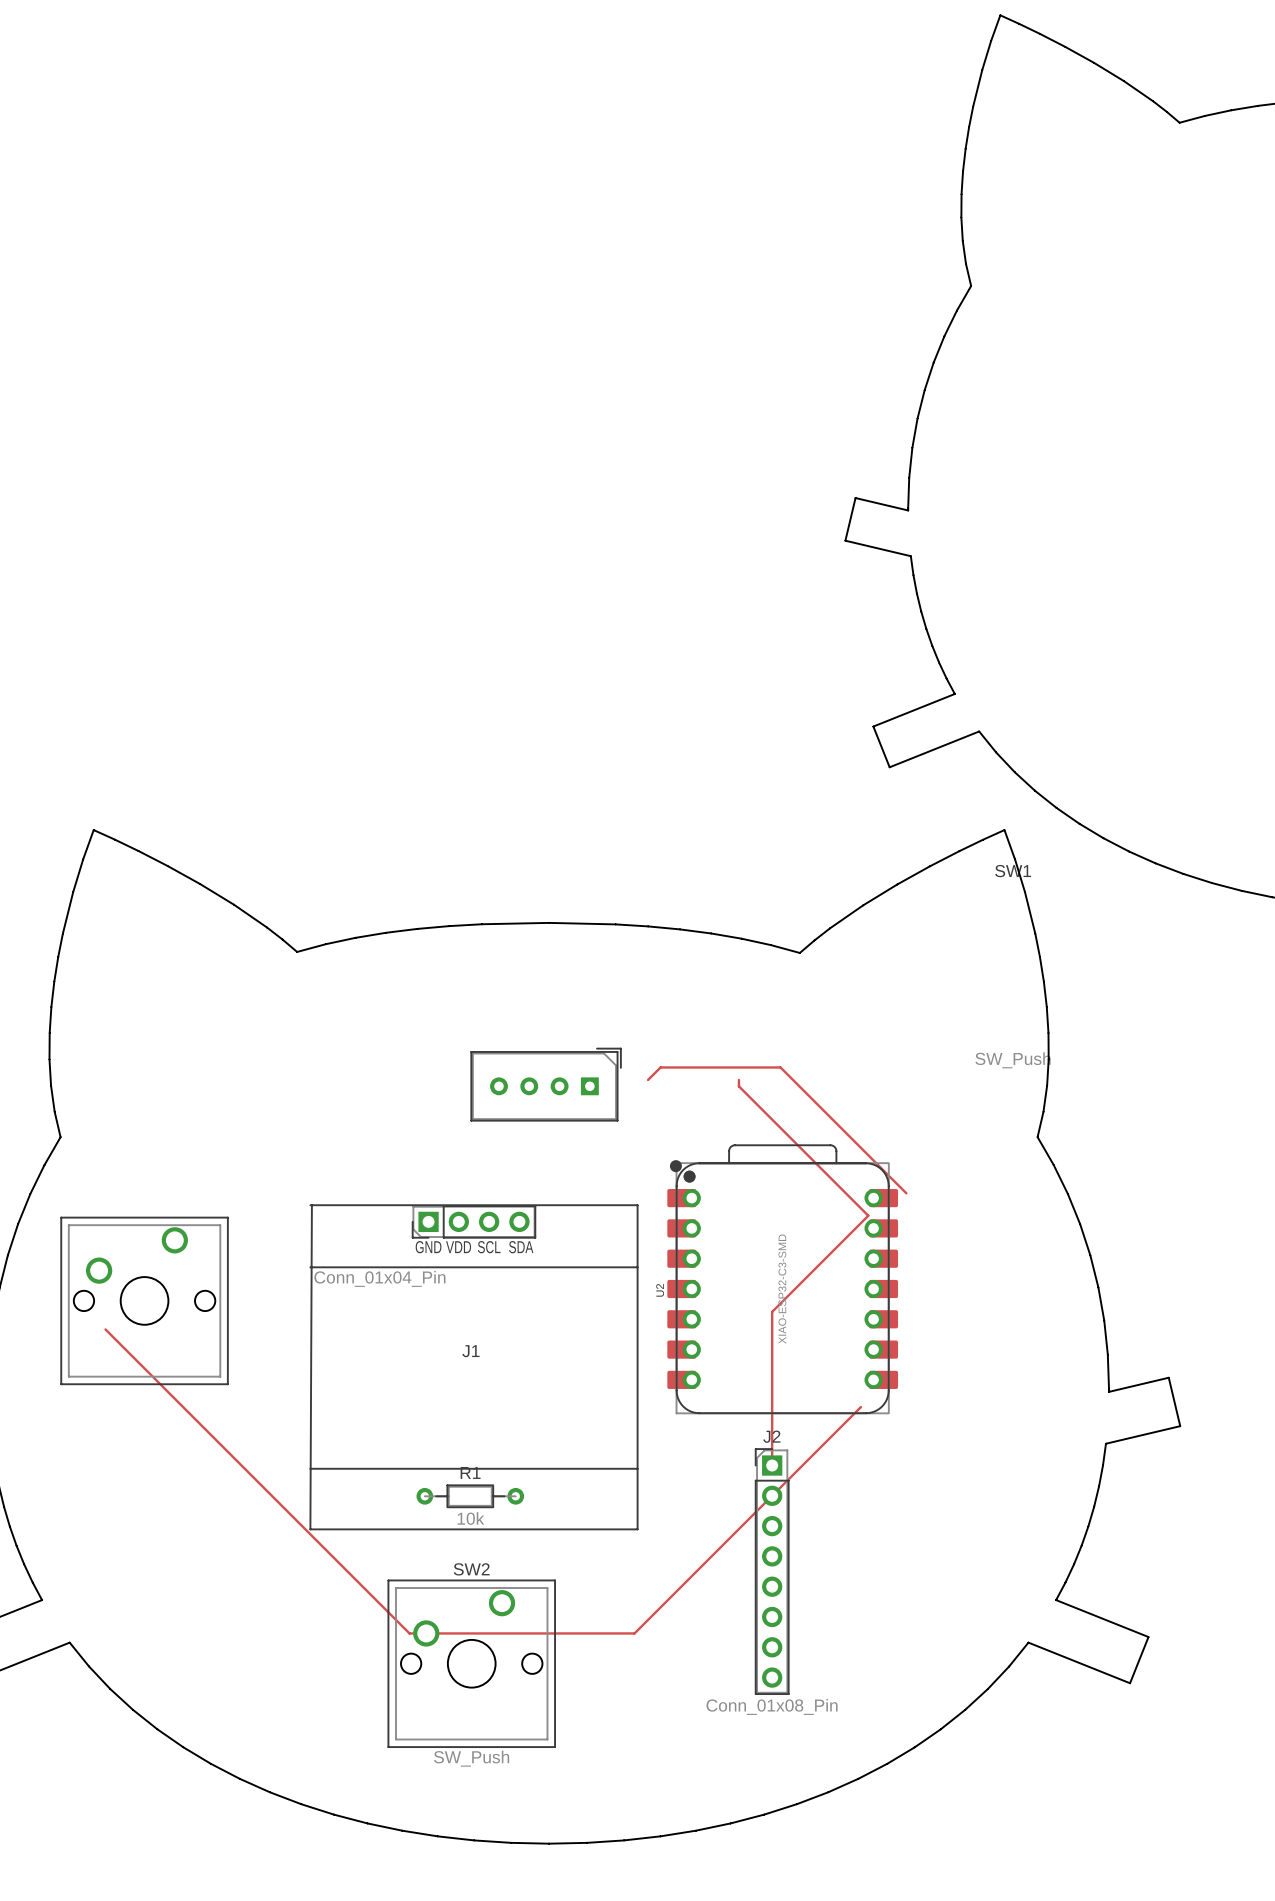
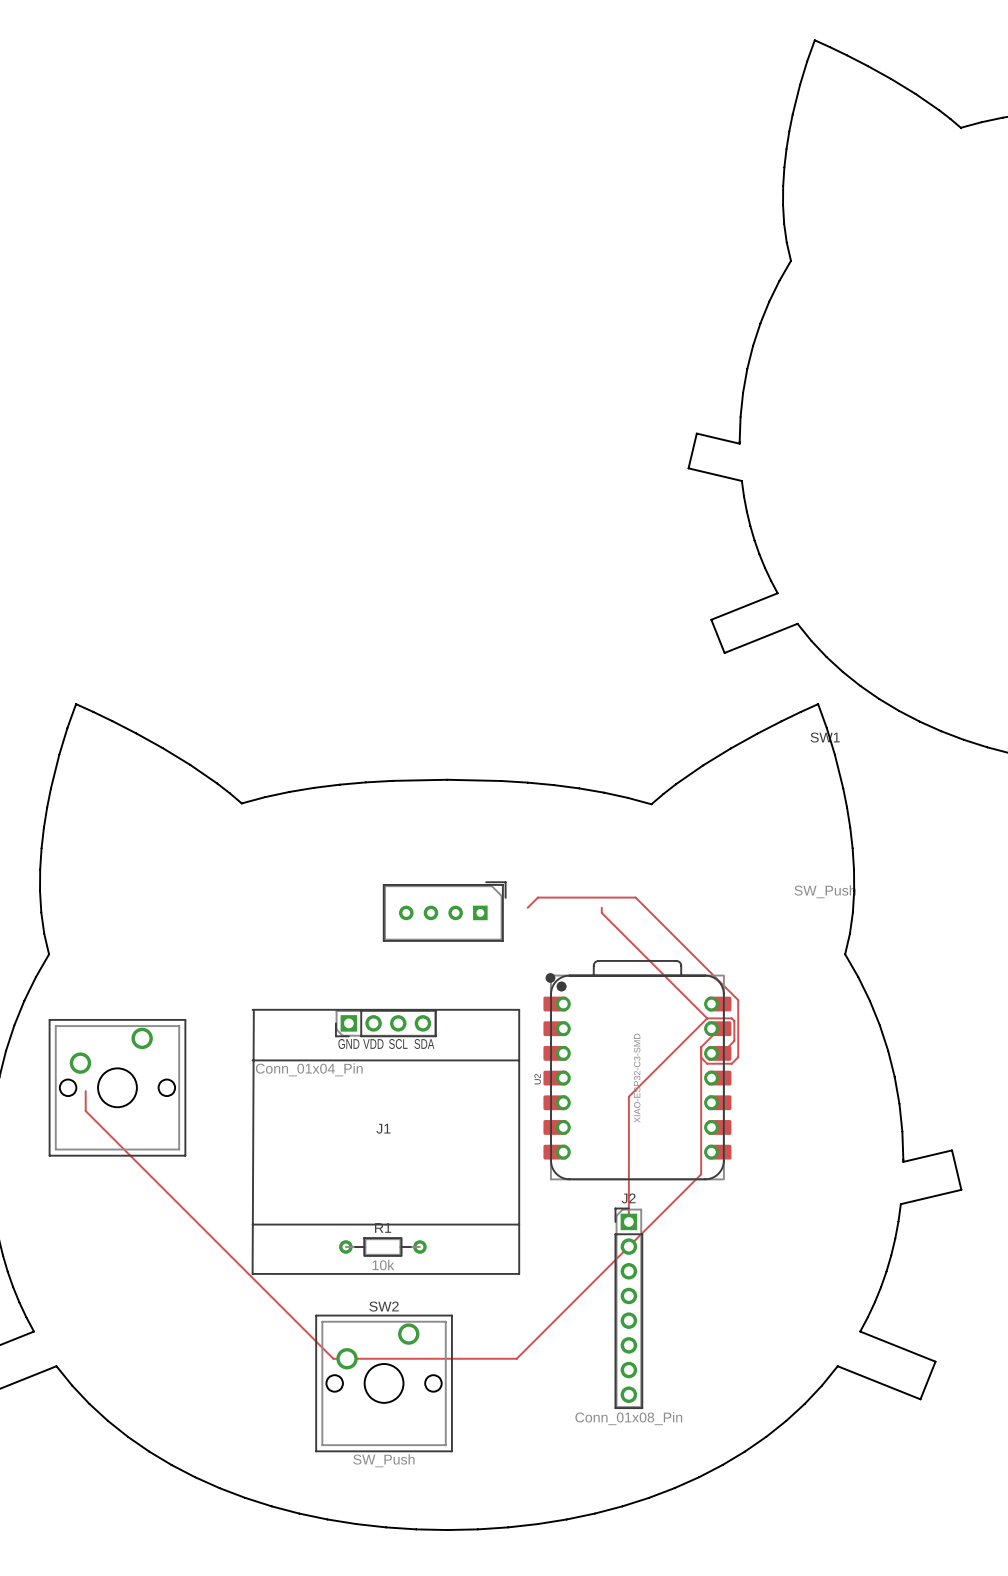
track: none -> (738, 1000) (738, 1057) (731, 1063) (707, 1063) (701, 1057)
track: none -> (707, 1018) (731, 1018) (734, 1020) (734, 1041) (721, 1053) (711, 1053)
track: none -> (719, 1028) (701, 1047) (701, 1174)
track: none -> (85, 1091) (85, 1111)

